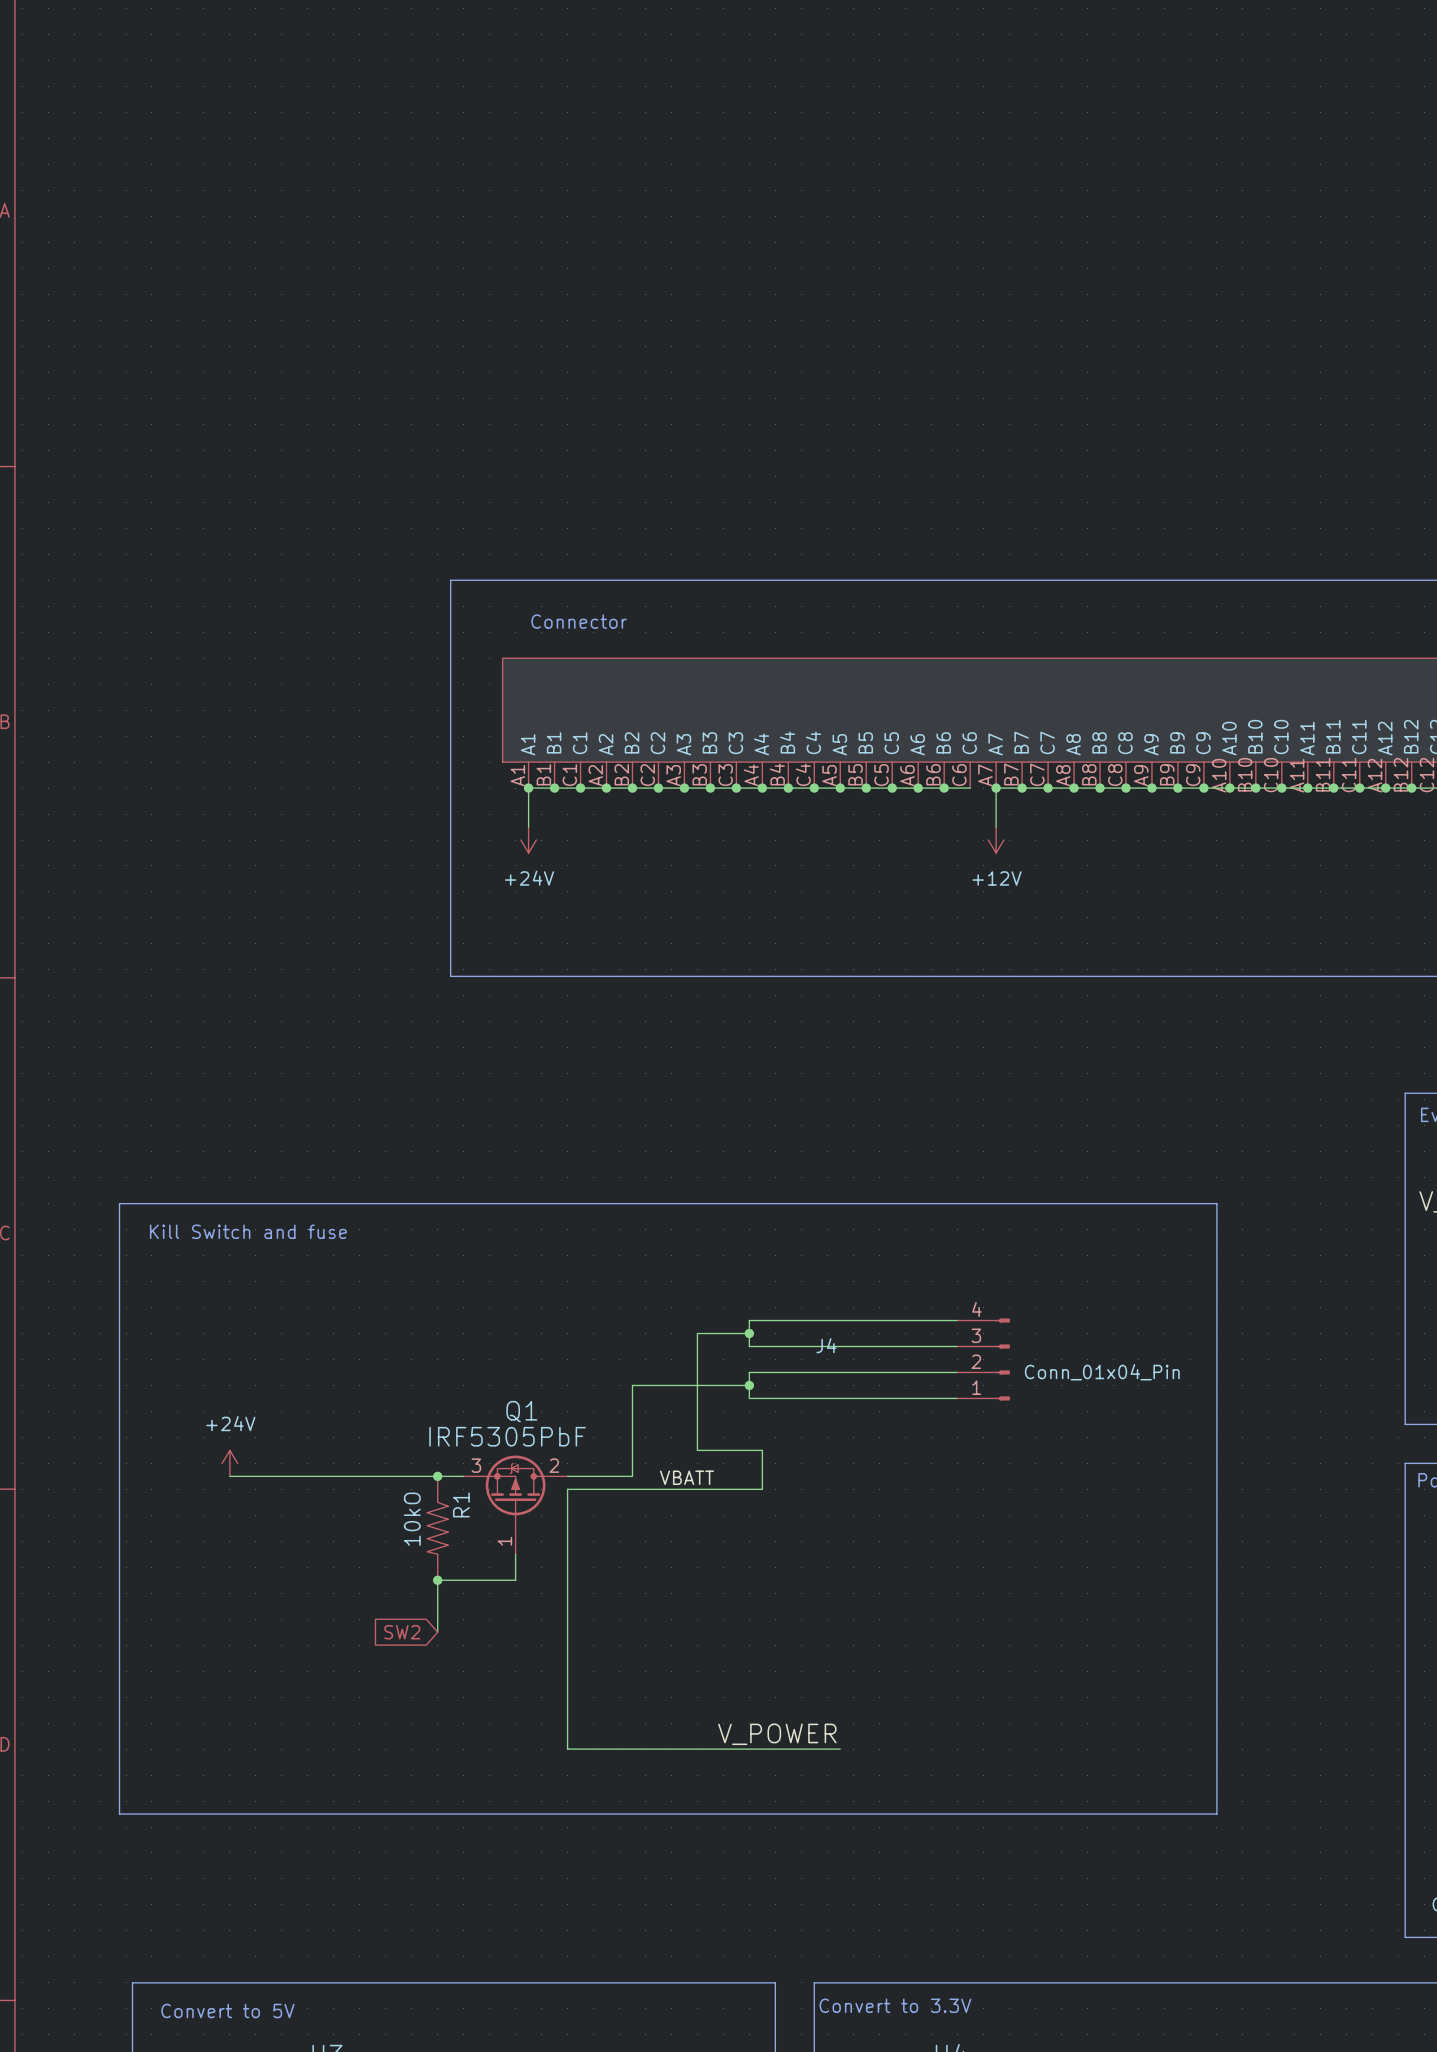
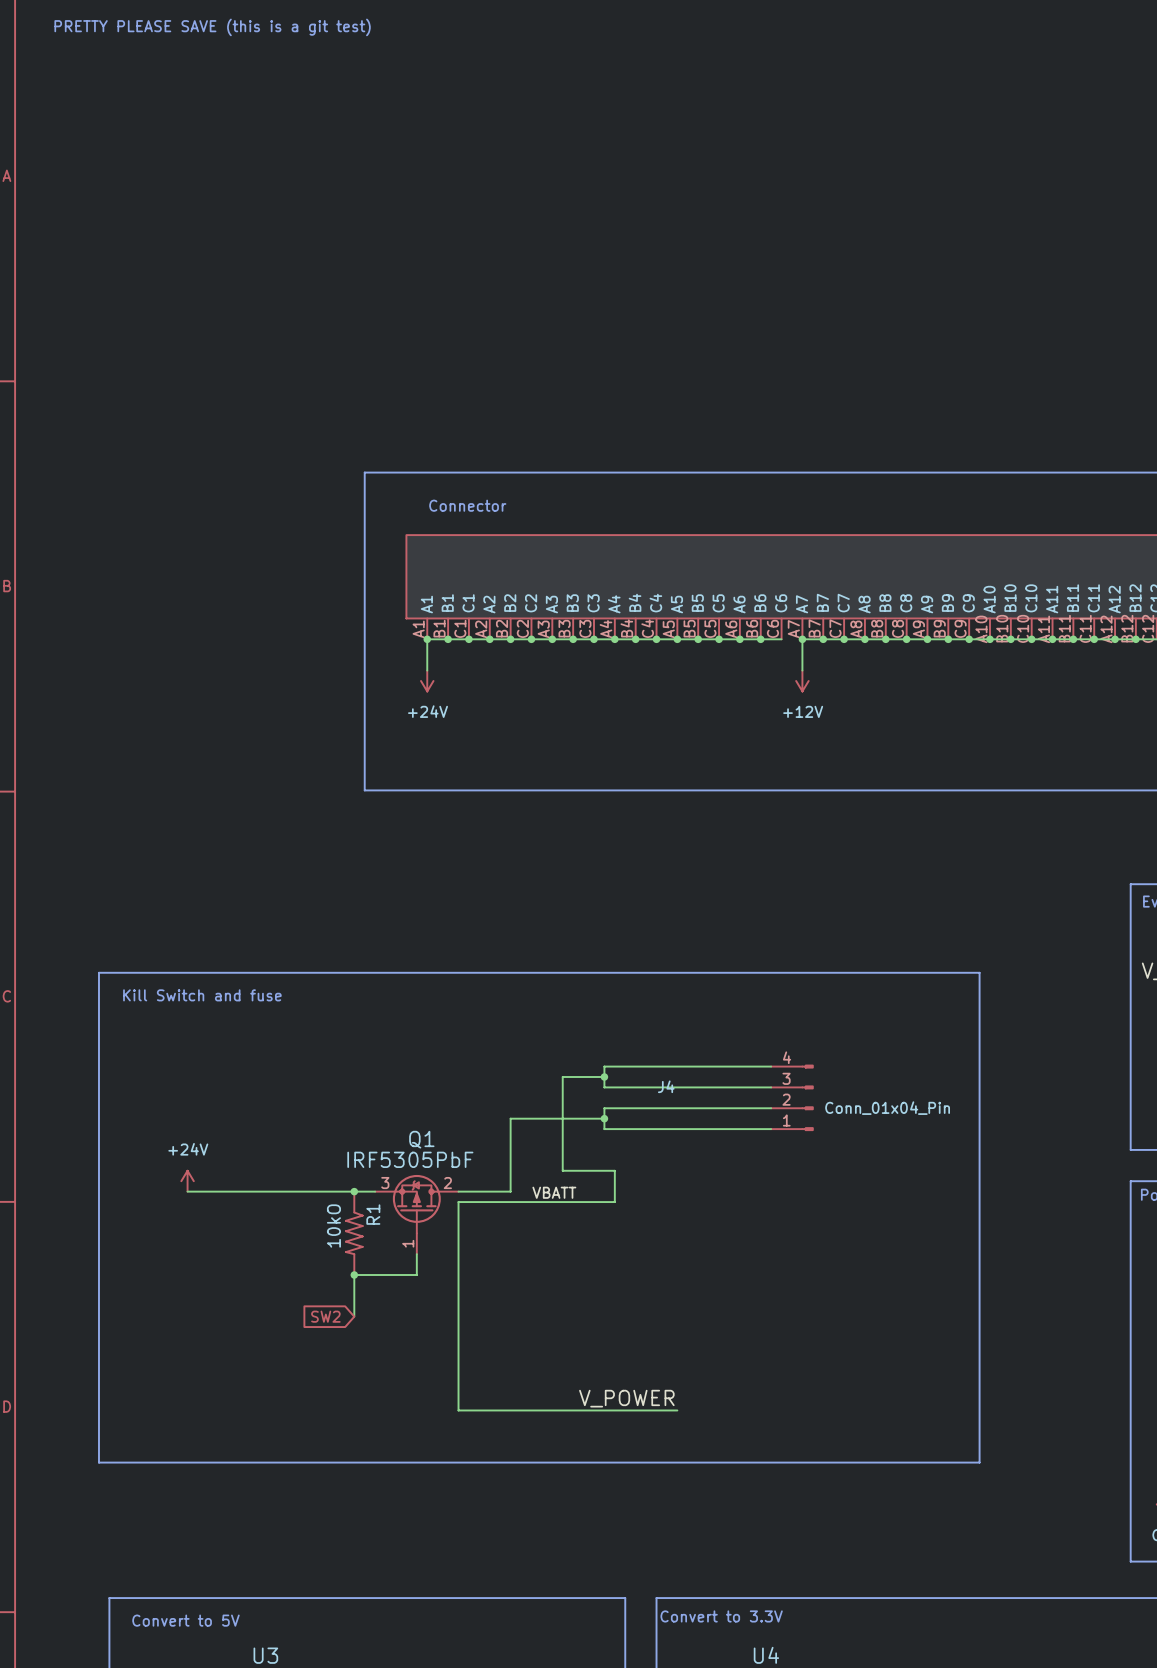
text: none -> PRETTY PLEASE SAVE (this is a git test) (212, 27)

